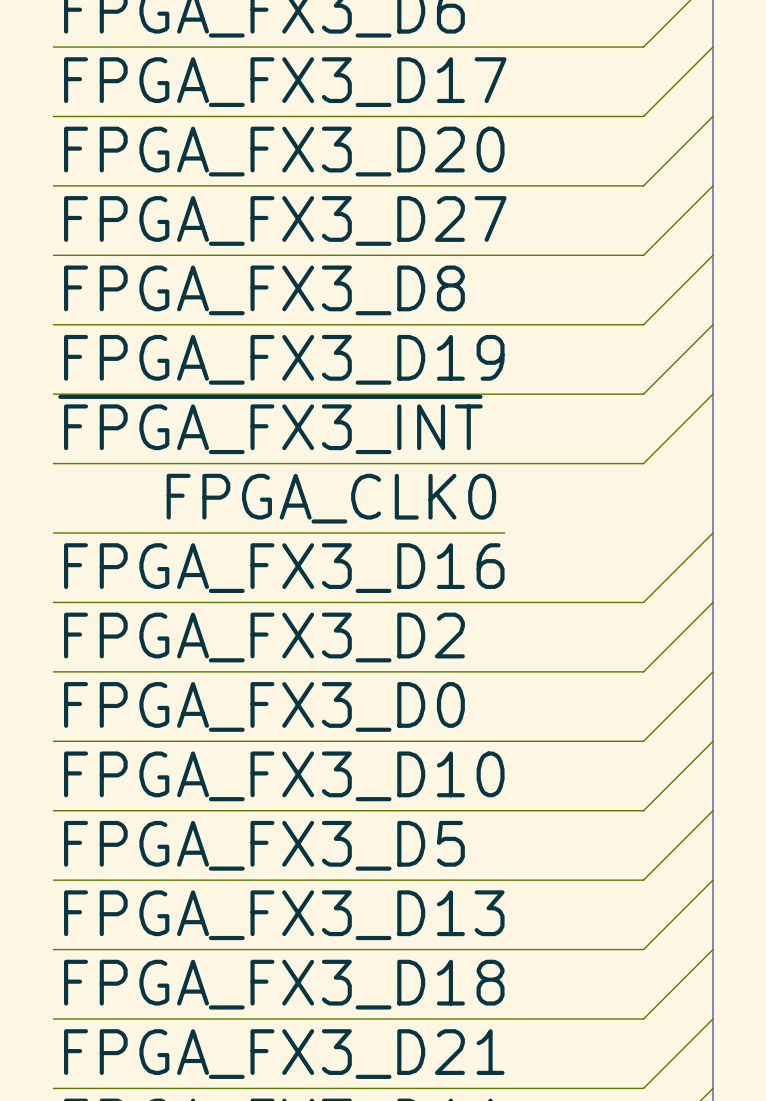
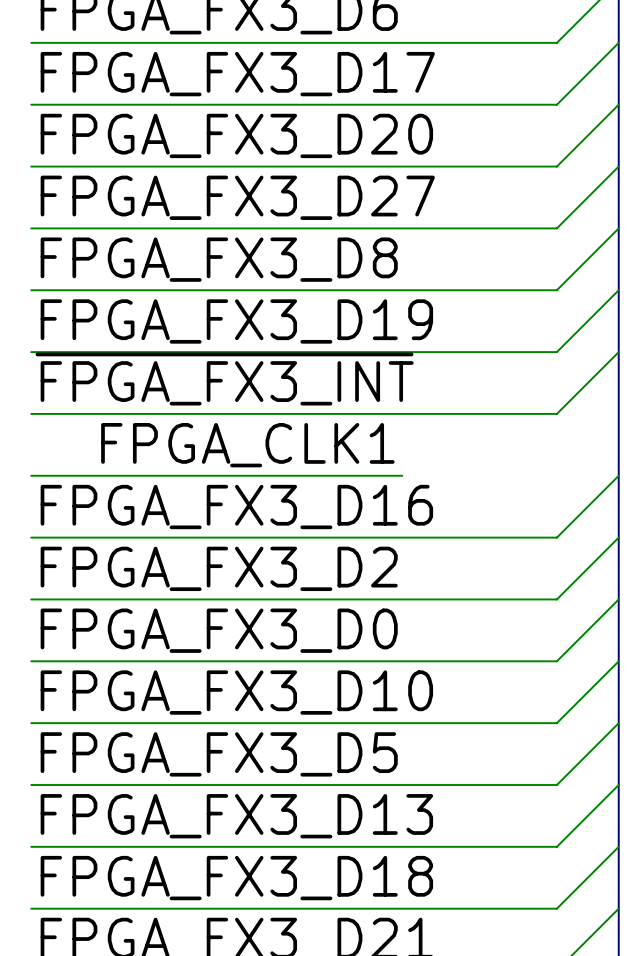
label: FPGA_CLK0 (331, 498) -> FPGA_CLK1 (247, 445)
wire: (469, 533) (504, 533) -> none

